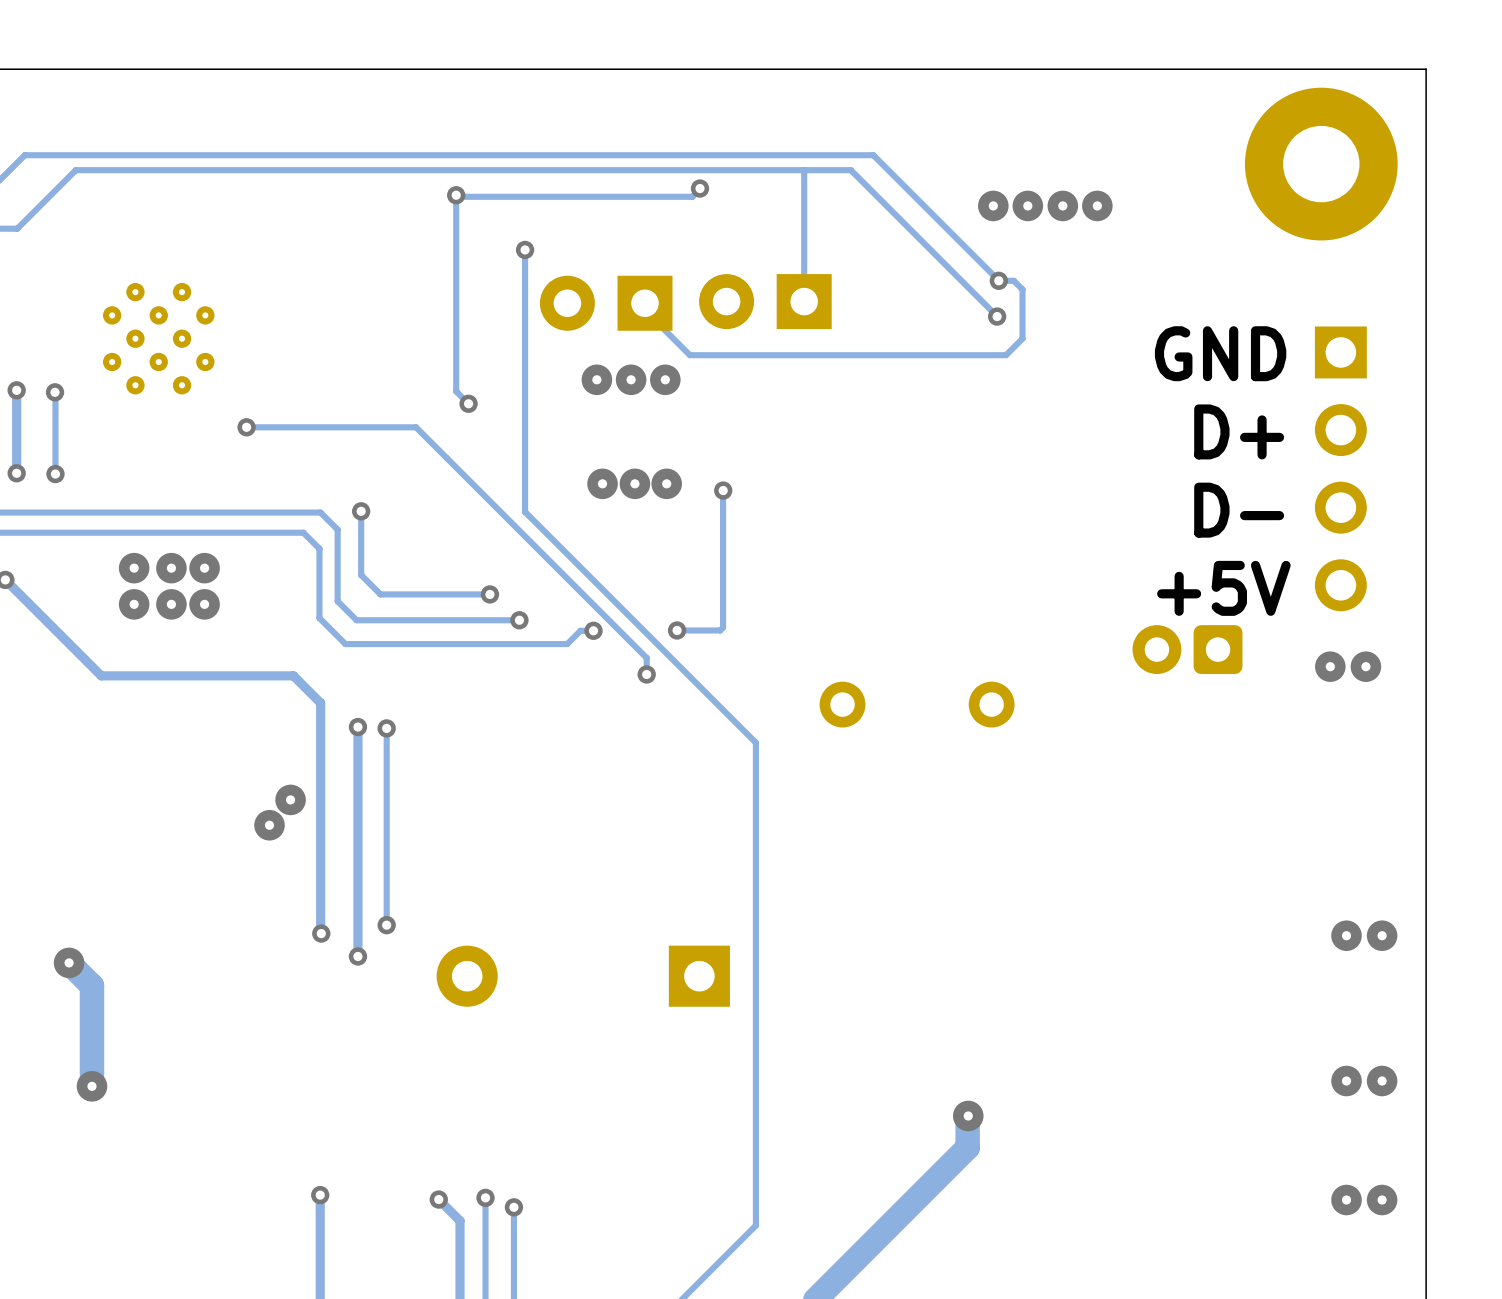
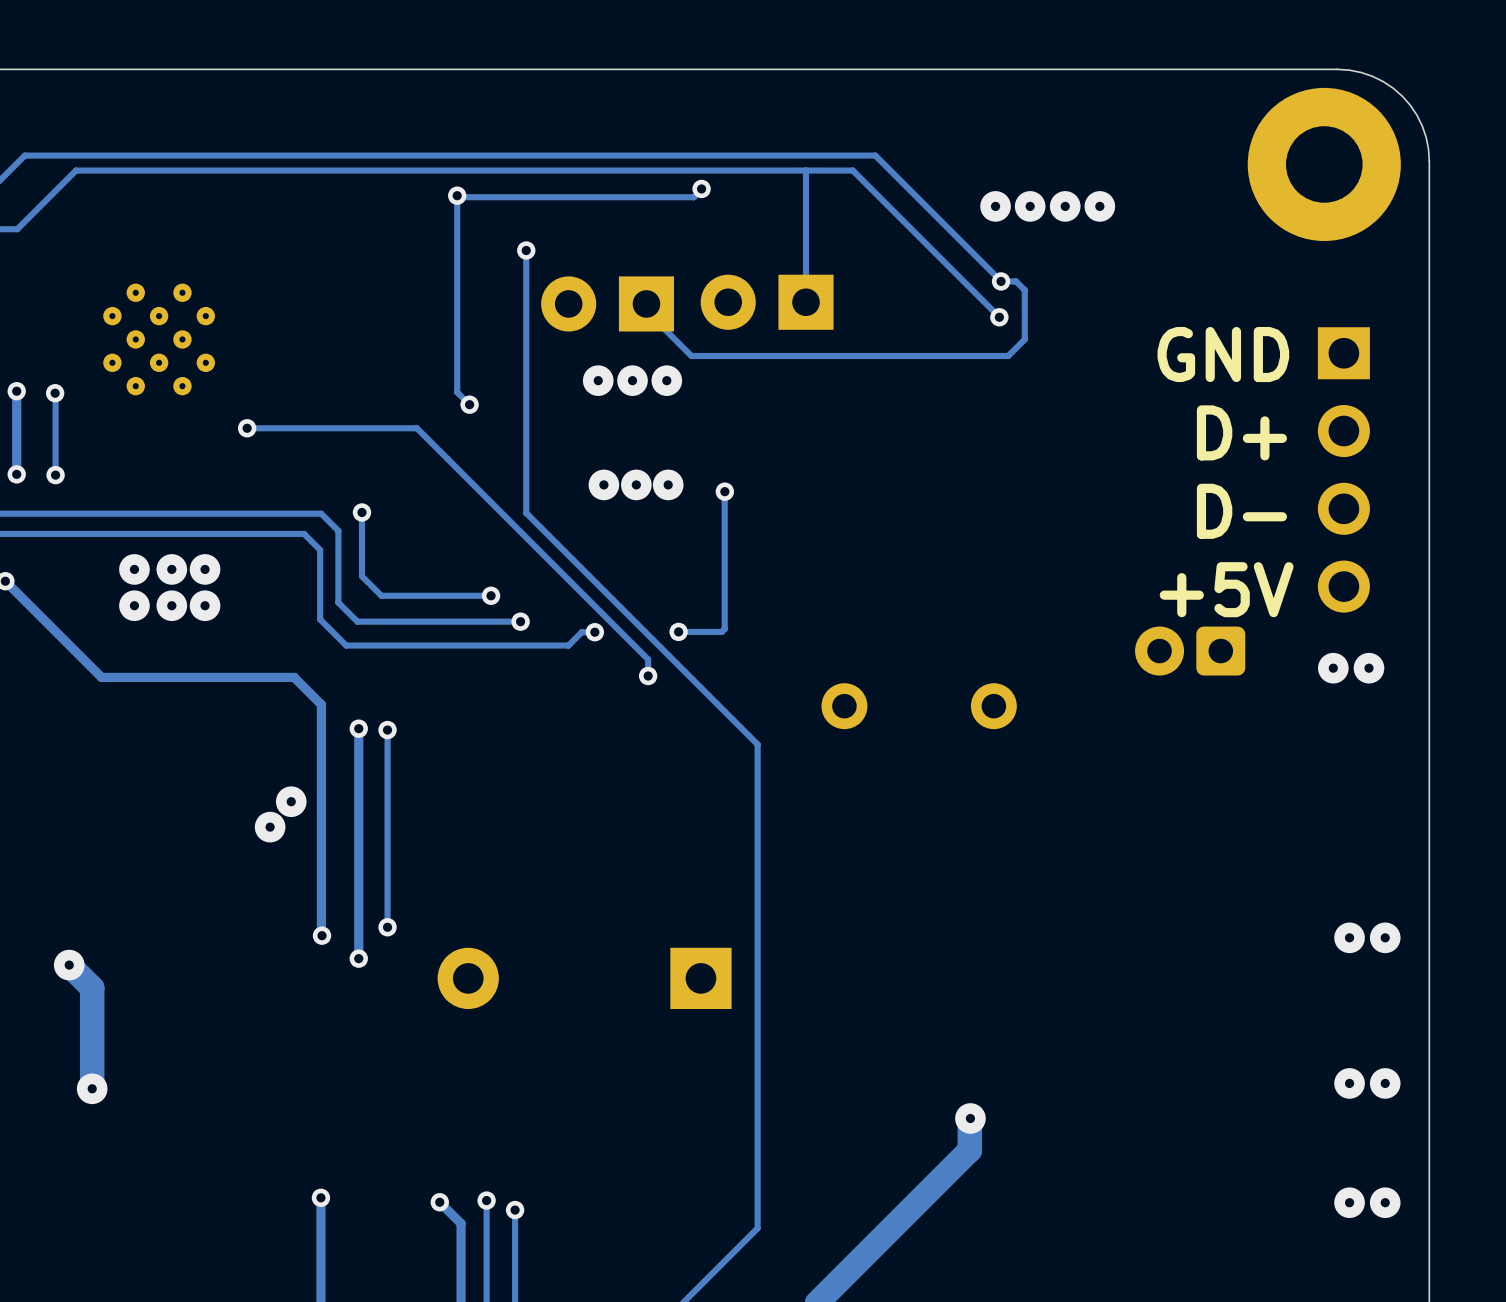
board edge: (1334, 69) (1426, 69) (1426, 160) -> (1337, 69) (1361, 72) (1372, 76) (1383, 81) (1402, 96) (1417, 115) (1422, 126) (1428, 149) (1429, 161)

